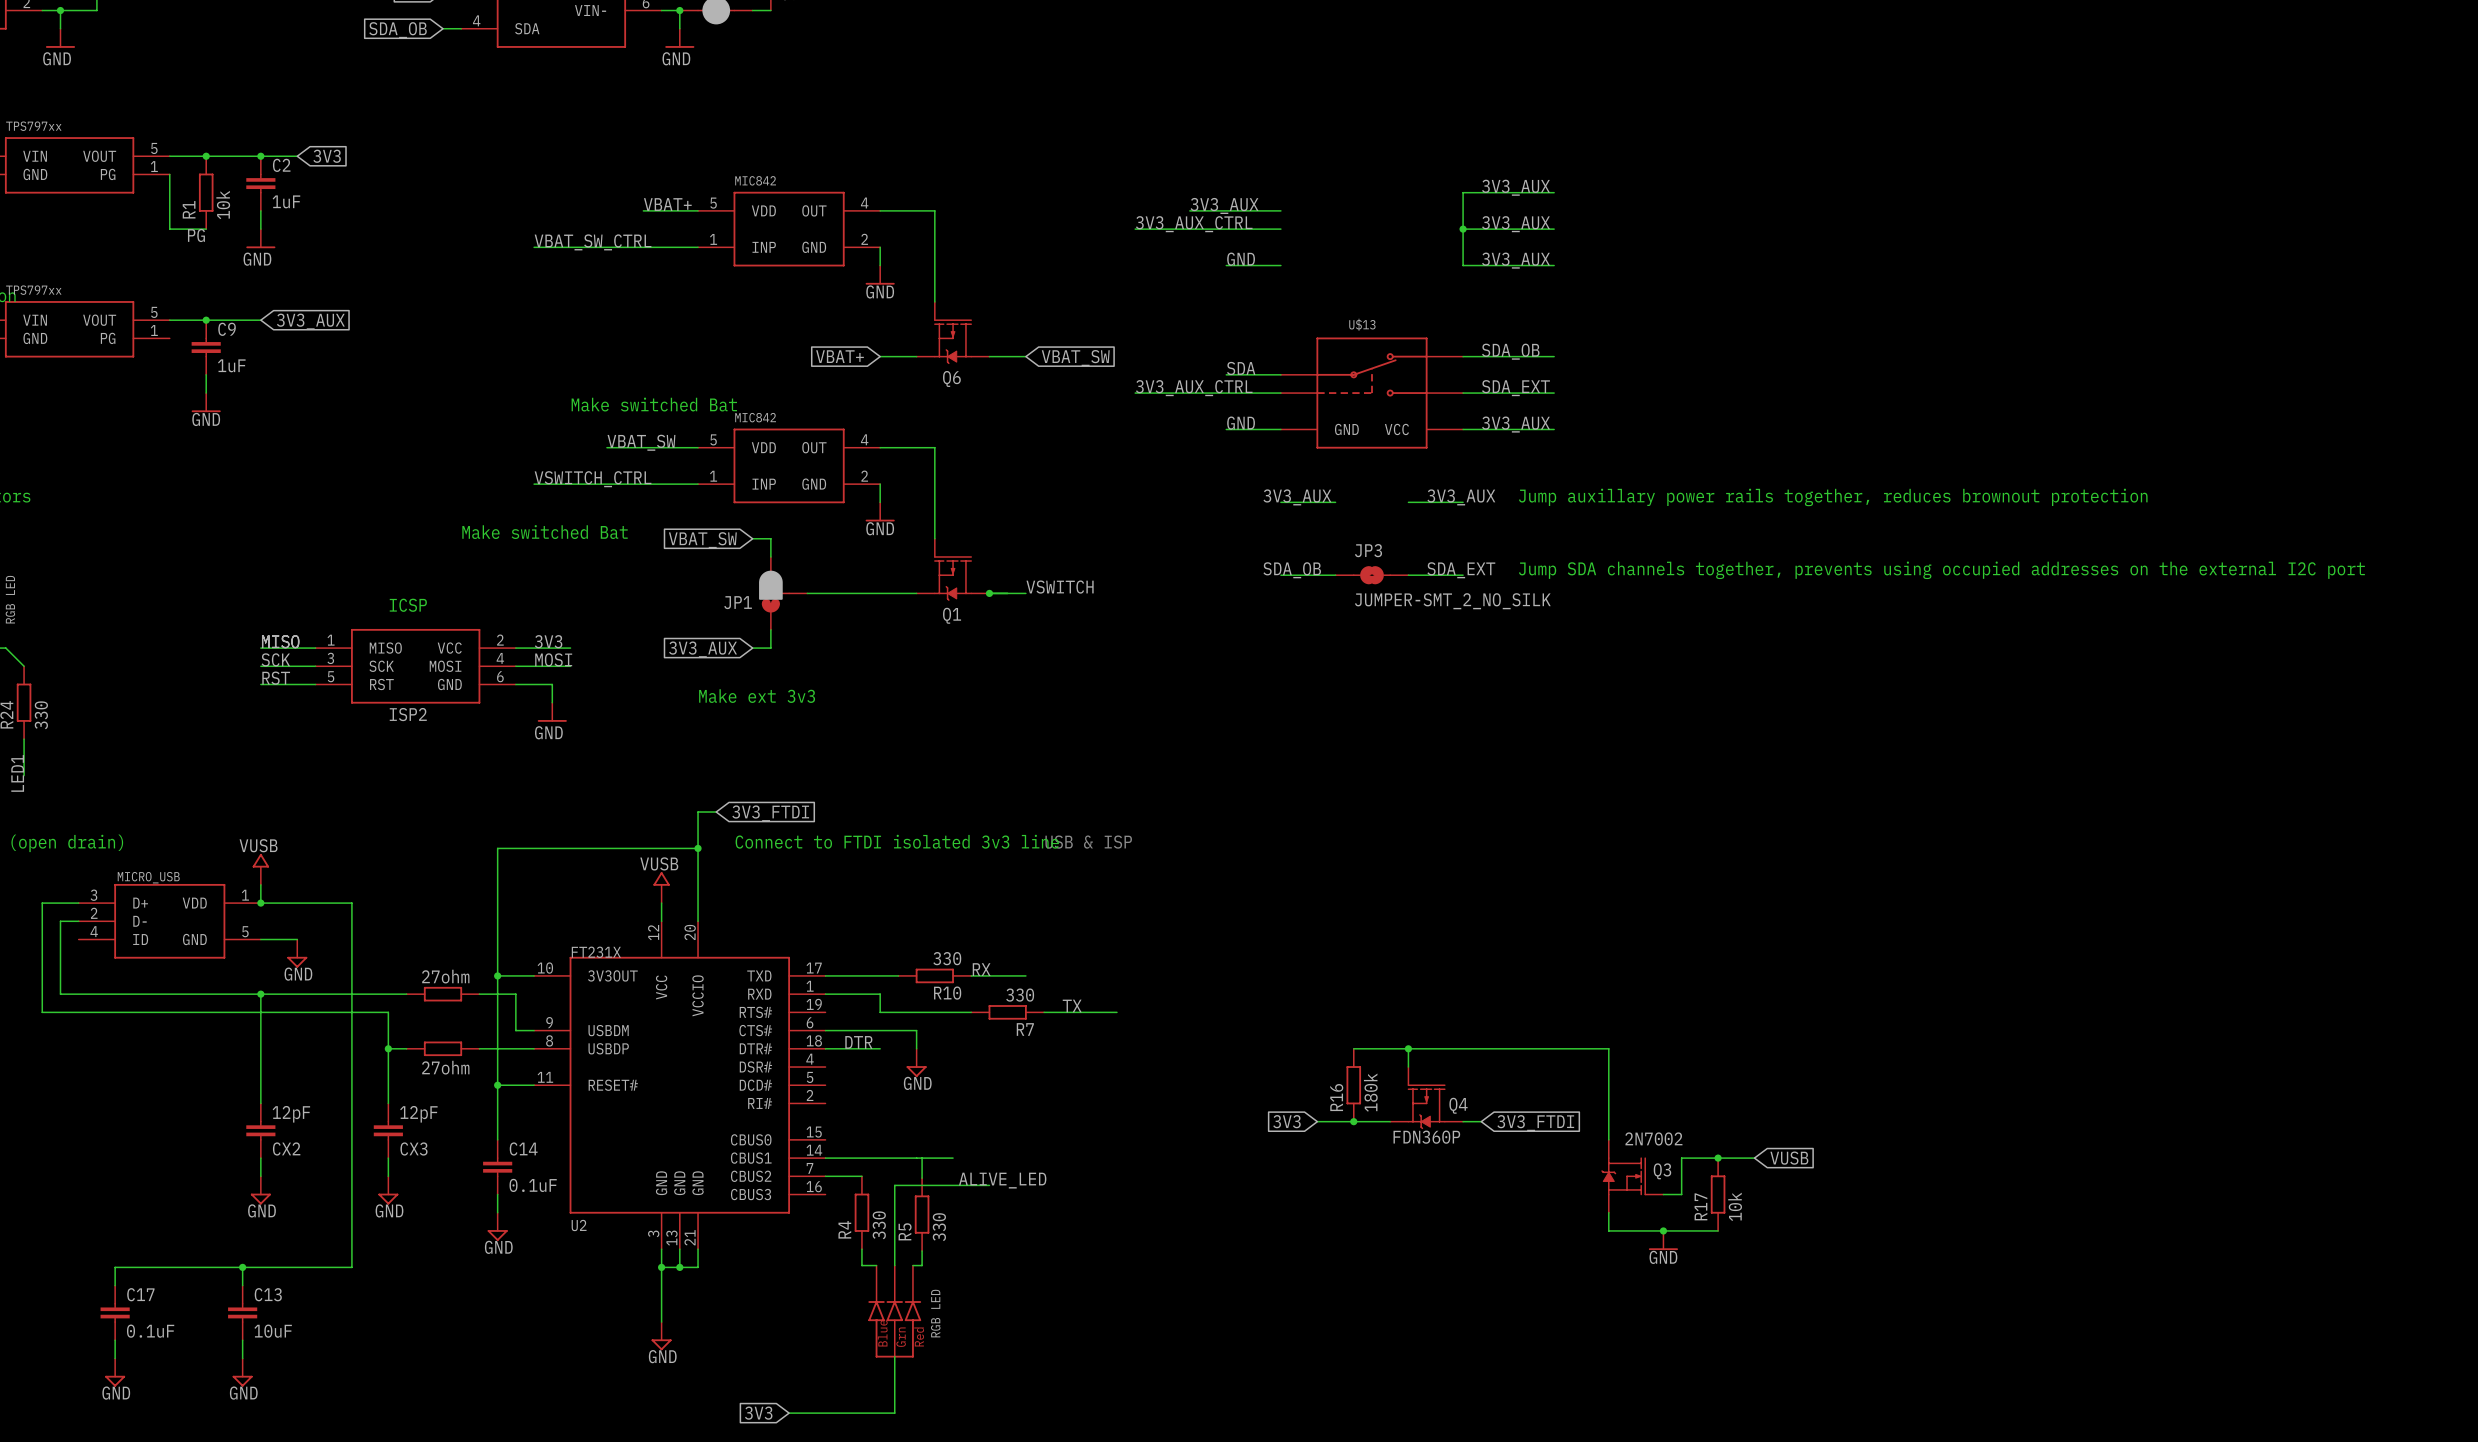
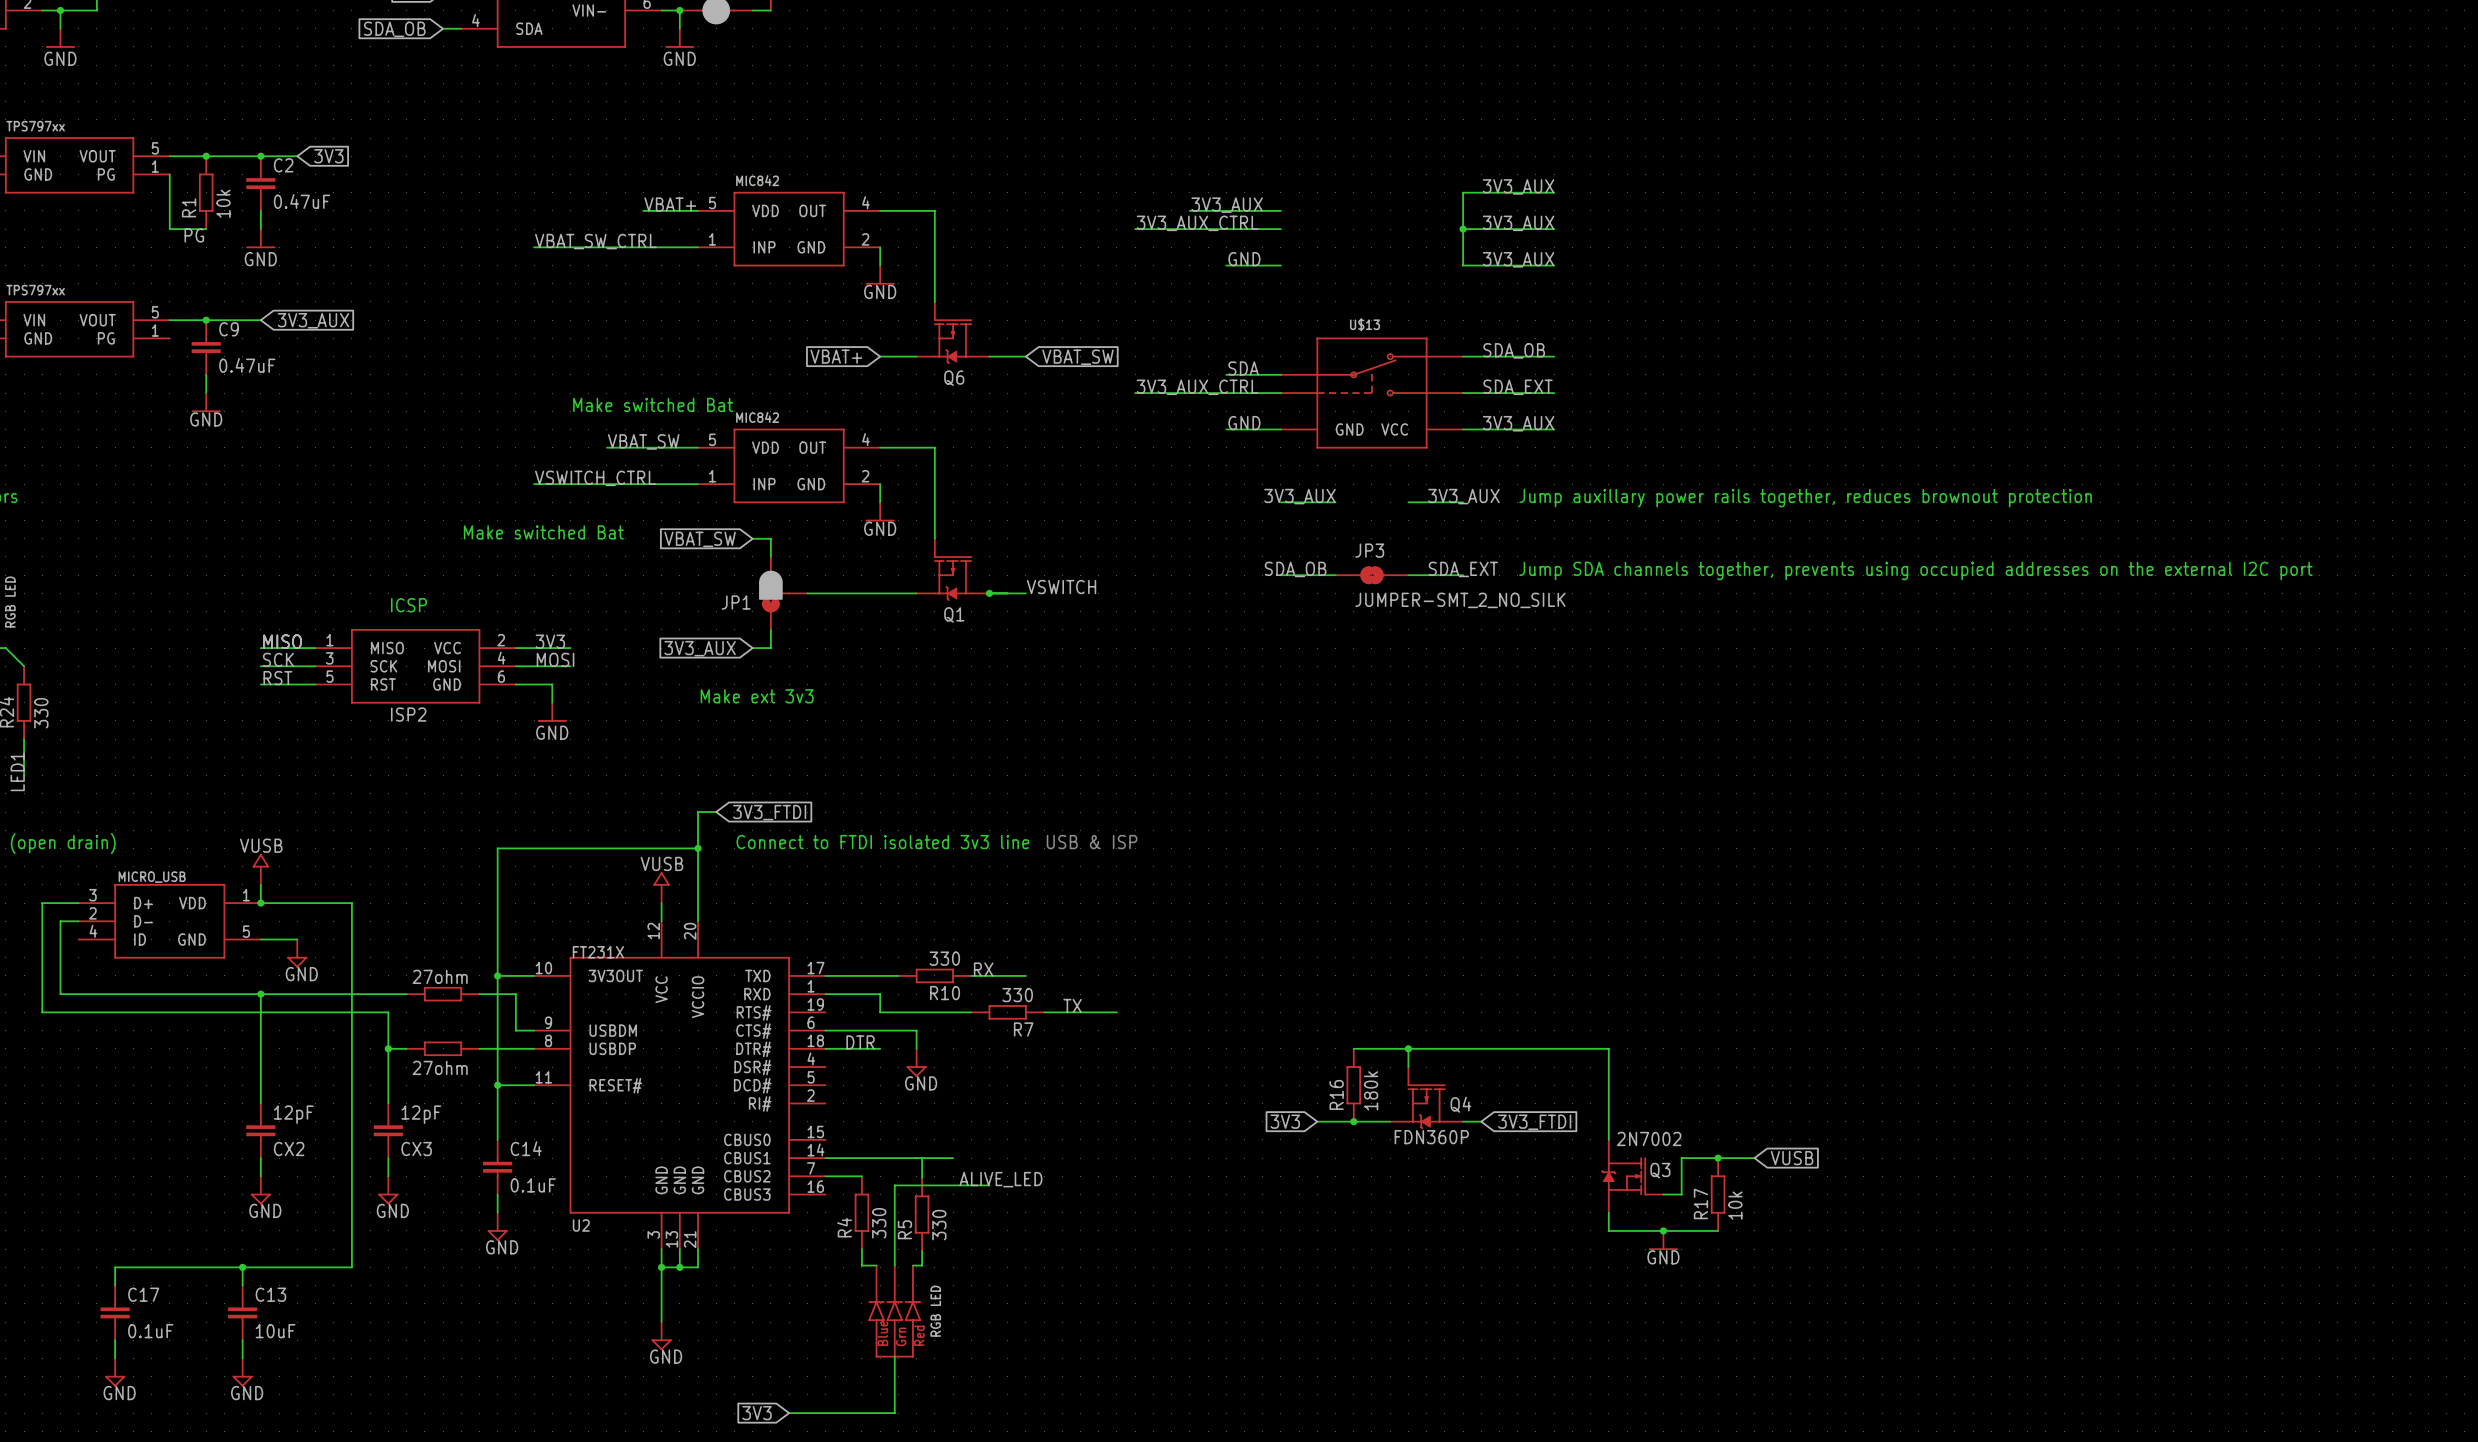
C2 value: 1uF (286, 201) -> 0.47uF (301, 201)
C9 value: 1uF (231, 365) -> 0.47uF (247, 365)

